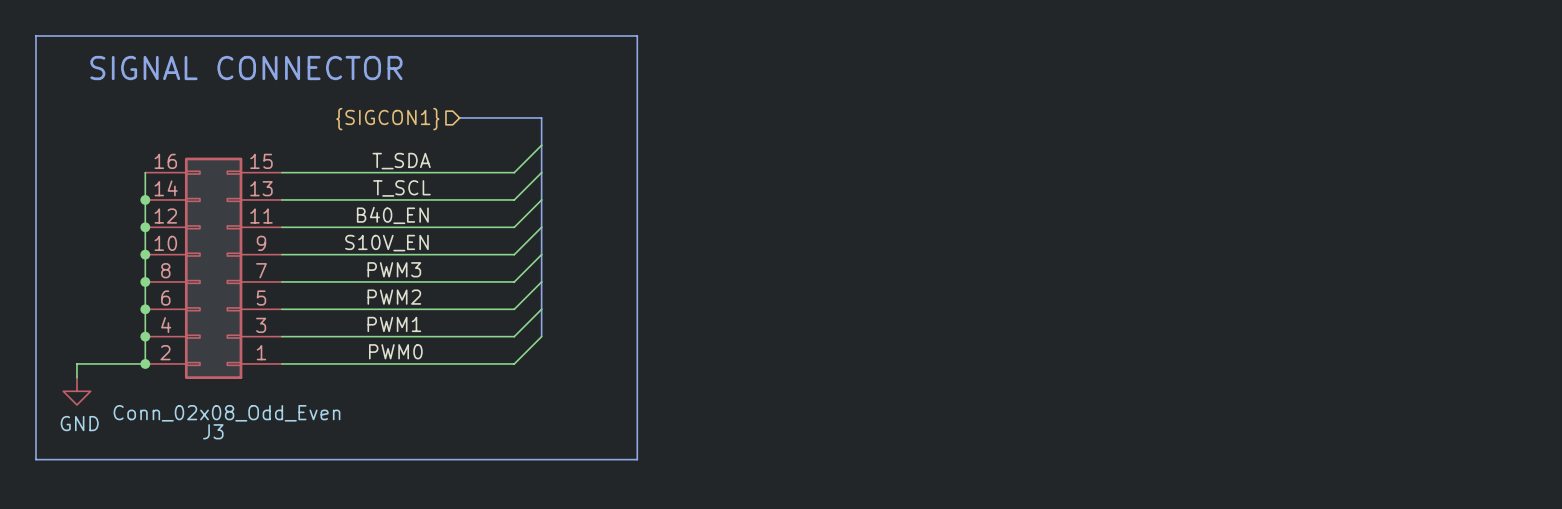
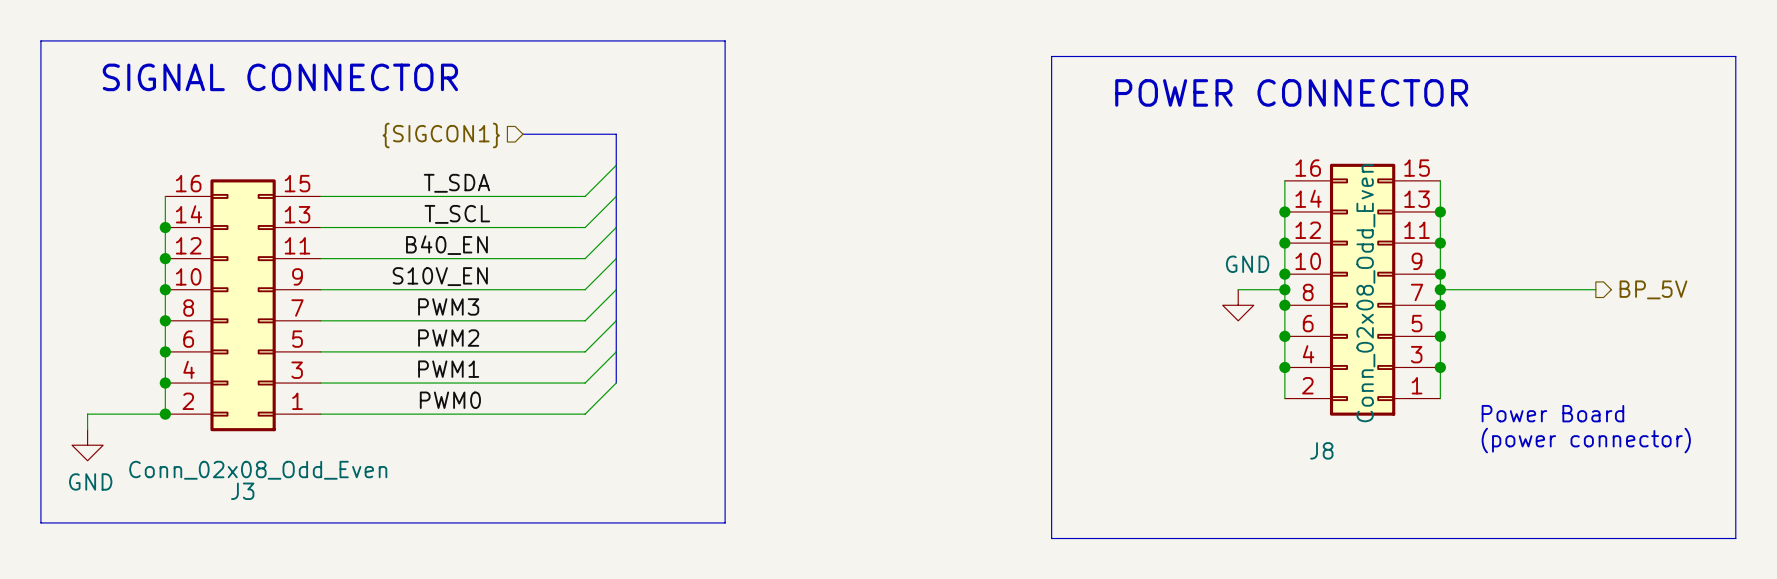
line: none -> (1051, 56) (1735, 56) (1735, 538) (1051, 538) (1051, 56)
text: none -> POWER CONNECTOR (1291, 92)
wire: none -> (1284, 180) (1284, 398)
wire: none -> (1440, 180) (1440, 398)
junction: none -> (1284, 211)
junction: none -> (1440, 211)
junction: none -> (1284, 243)
junction: none -> (1440, 243)
junction: none -> (1284, 274)
junction: none -> (1440, 274)
wire: none -> (1238, 289) (1284, 289)
junction: none -> (1284, 289)
J8: none -> Conn_02x08_Odd_Even (1362, 289)
wire: none -> (1440, 289) (1595, 289)
junction: none -> (1440, 289)
hierarchical label: none -> BP_5V (1653, 289)
power symbol: none -> GND (1238, 305)
junction: none -> (1284, 305)
junction: none -> (1440, 305)
junction: none -> (1284, 336)
junction: none -> (1440, 336)
junction: none -> (1284, 367)
junction: none -> (1440, 367)
text: none -> Power Board (1552, 413)
text: none -> (power connector) (1586, 440)

